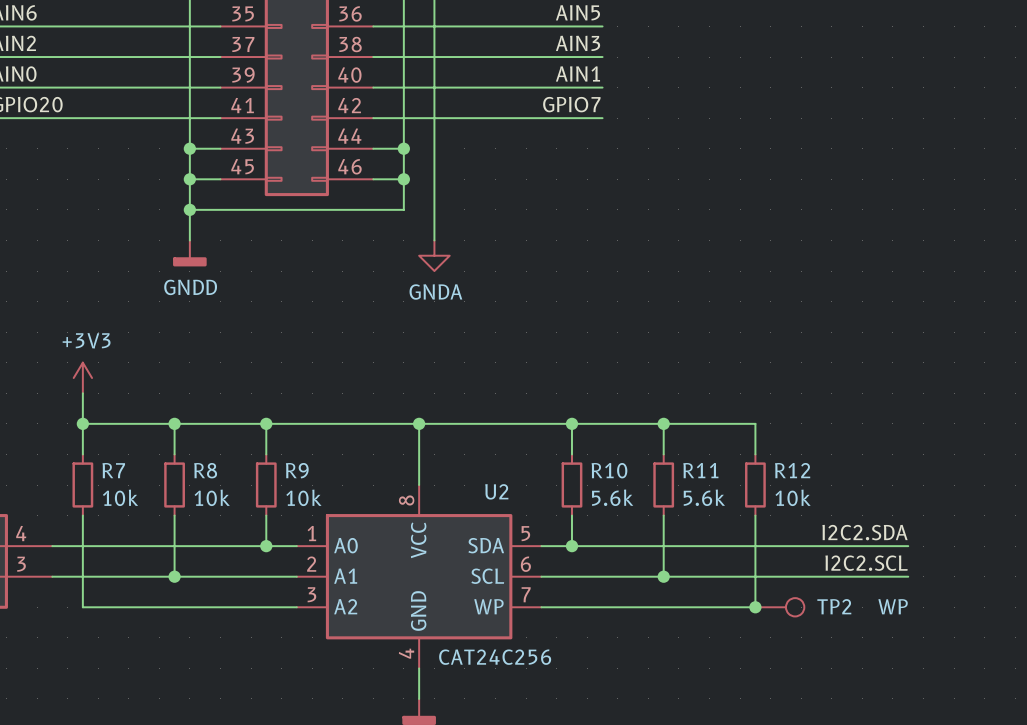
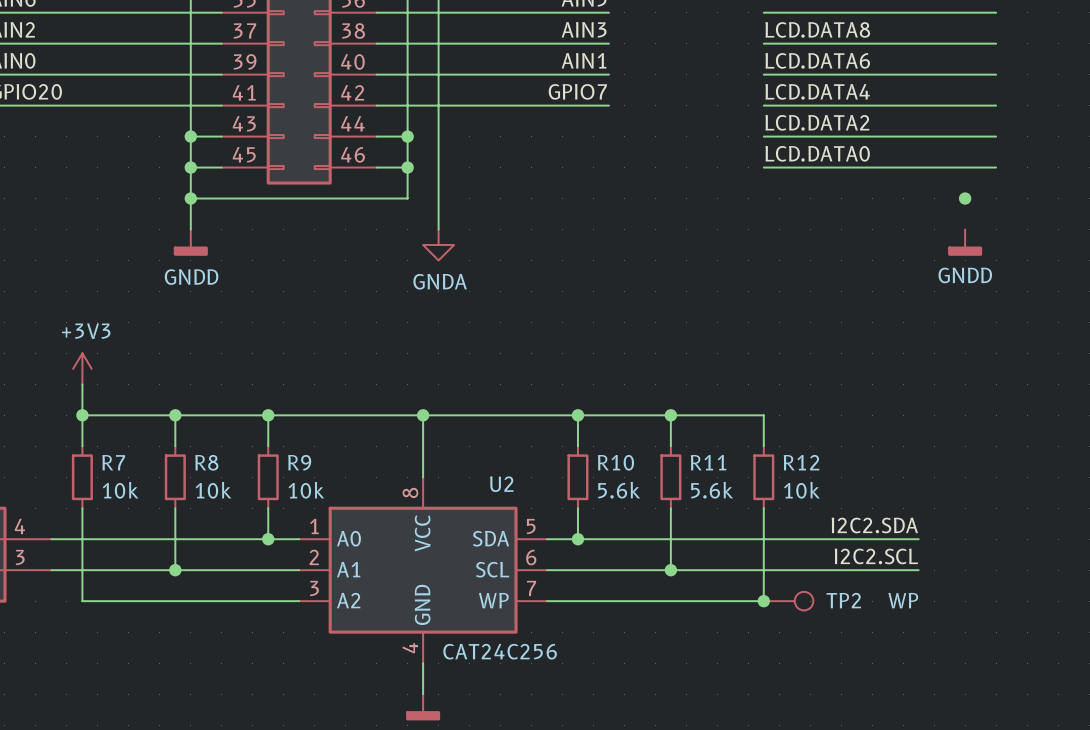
wire: none -> (763, 12) (996, 12)
label: none -> LCD.DATA8 (817, 29)
wire: none -> (763, 43) (996, 43)
label: none -> LCD.DATA6 (817, 60)
wire: none -> (763, 74) (996, 74)
label: none -> LCD.DATA4 (817, 91)
wire: none -> (763, 105) (996, 105)
label: none -> LCD.DATA2 (817, 122)
wire: none -> (763, 136) (996, 136)
label: none -> LCD.DATA0 (817, 153)
wire: none -> (763, 167) (996, 167)
junction: none -> (965, 198)
power symbol: none -> GNDD (965, 242)

